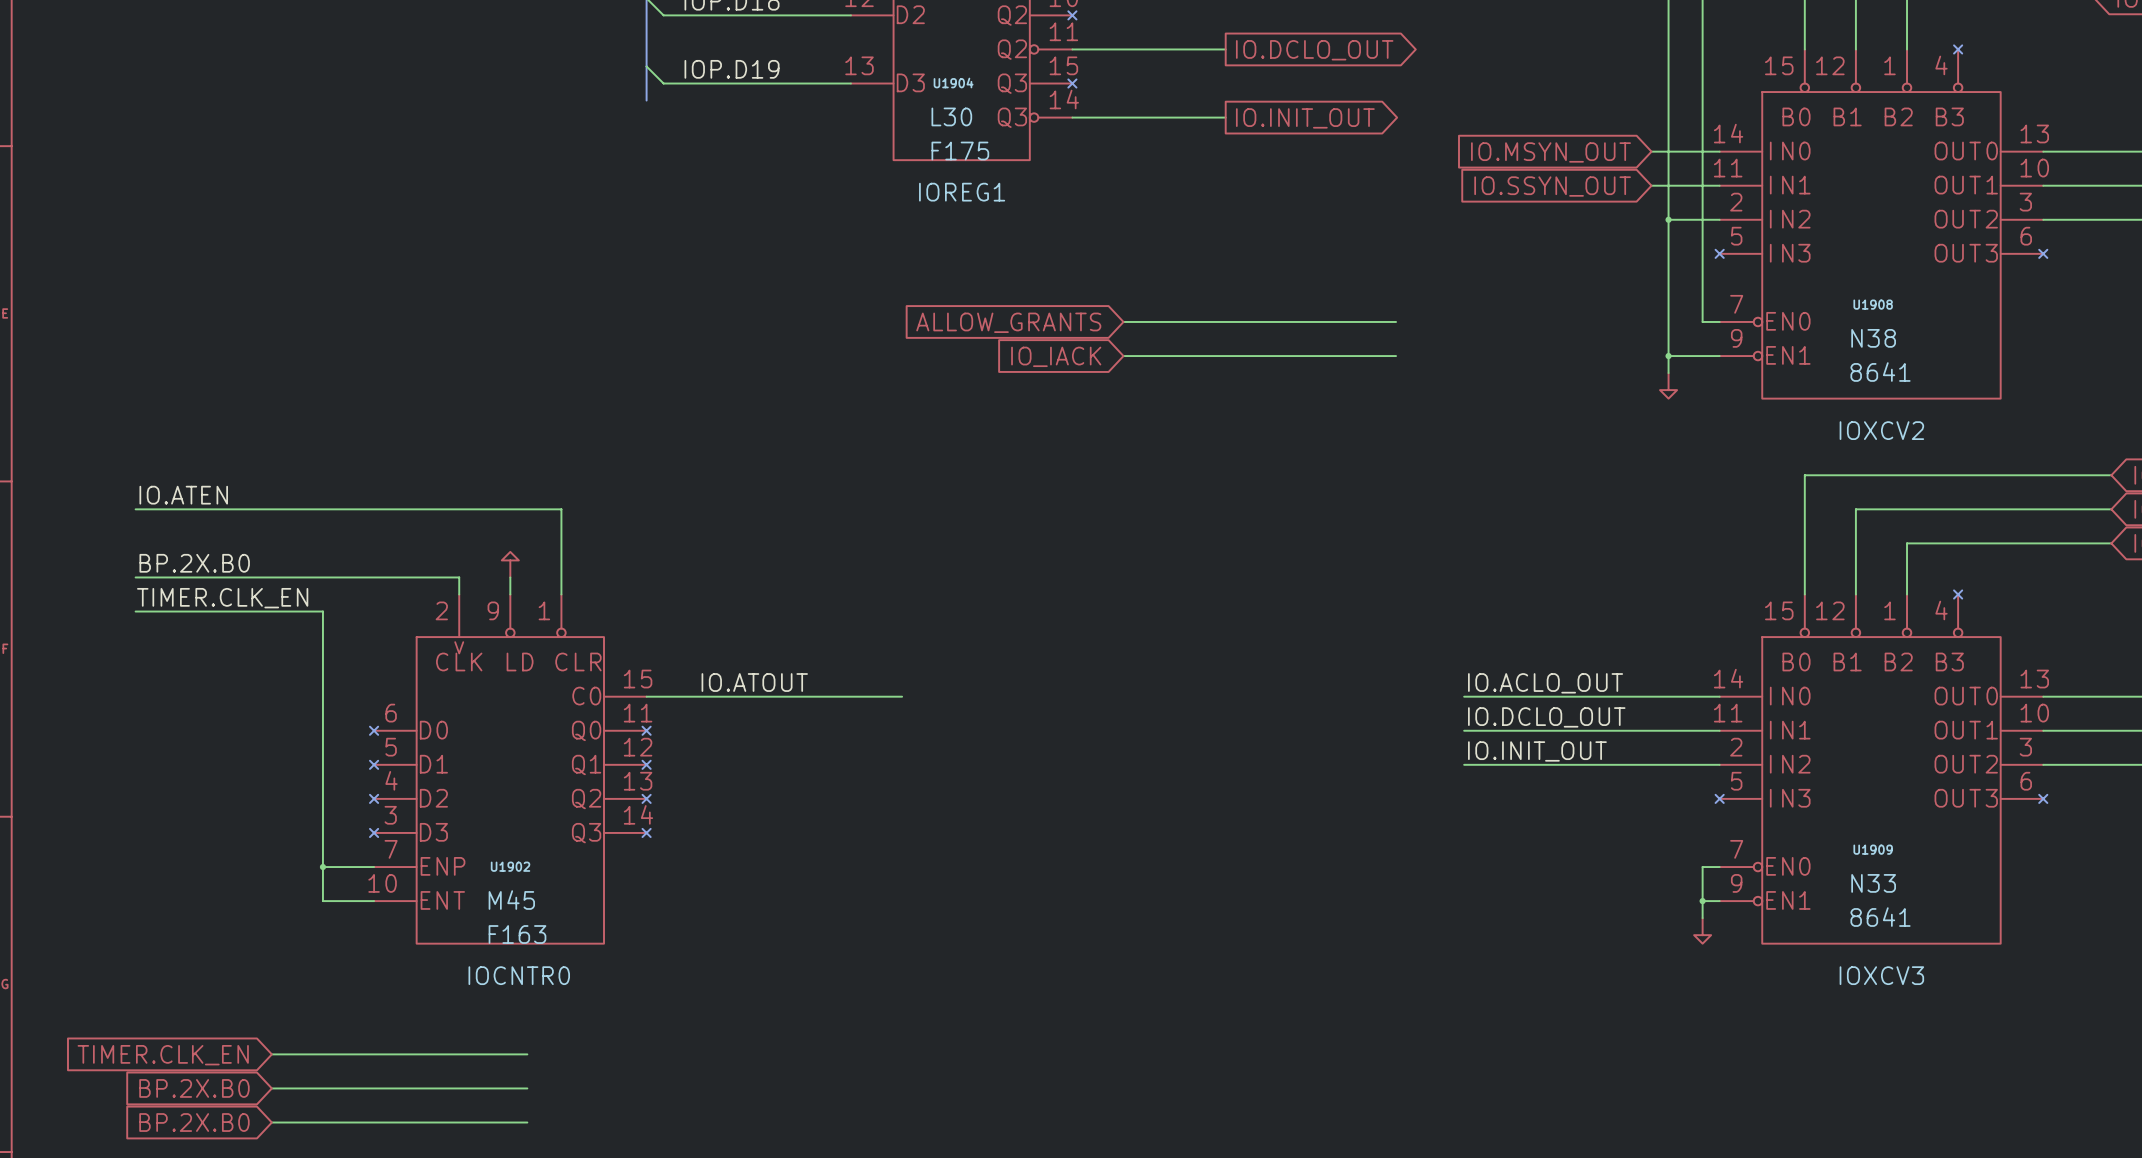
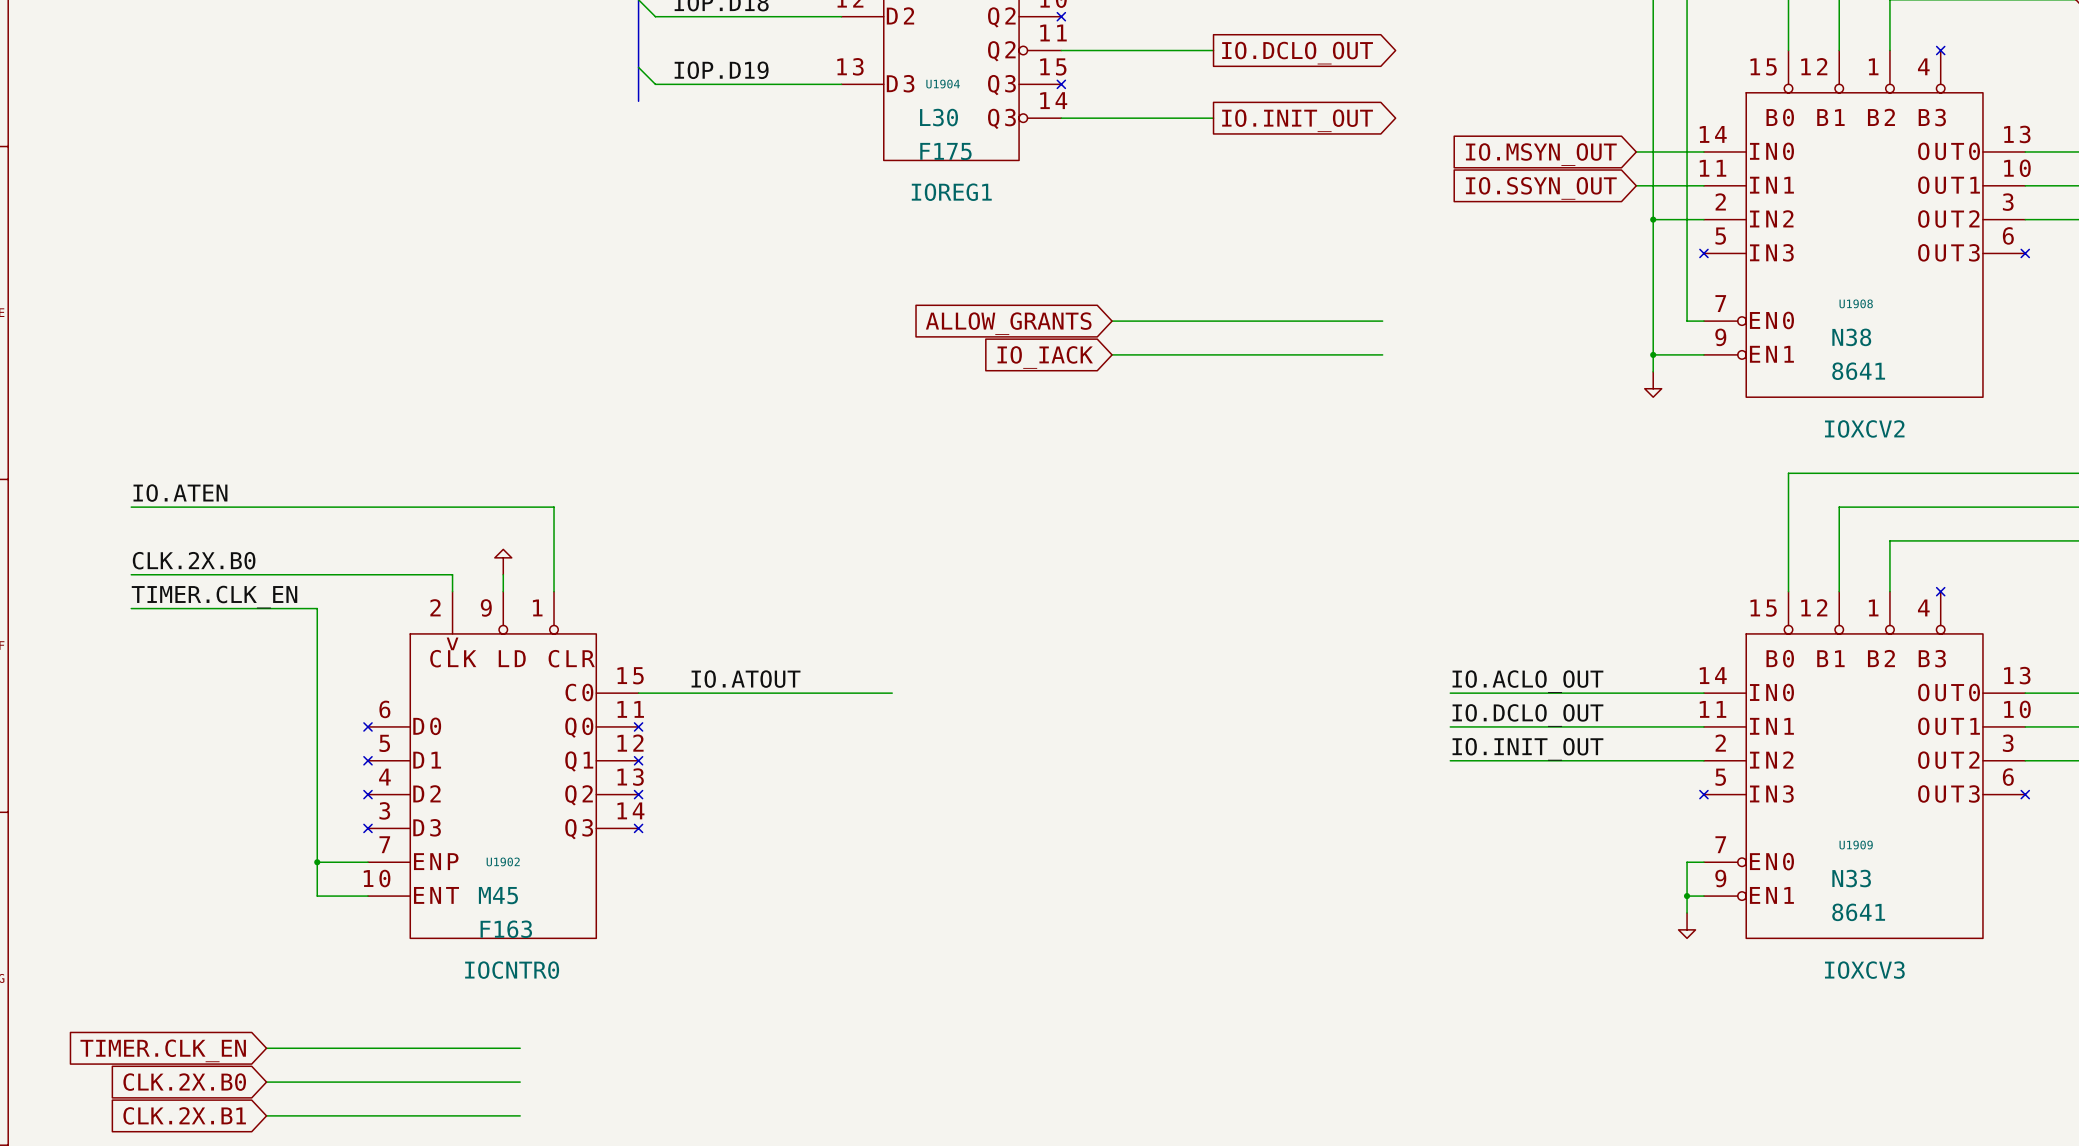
label: BP.2X.B0 (194, 563) -> CLK.2X.B0 (194, 560)
global label: BP.2X.B0 (194, 1088) -> CLK.2X.B0 (184, 1082)
global label: BP.2X.B0 (194, 1122) -> CLK.2X.B1 (184, 1115)

